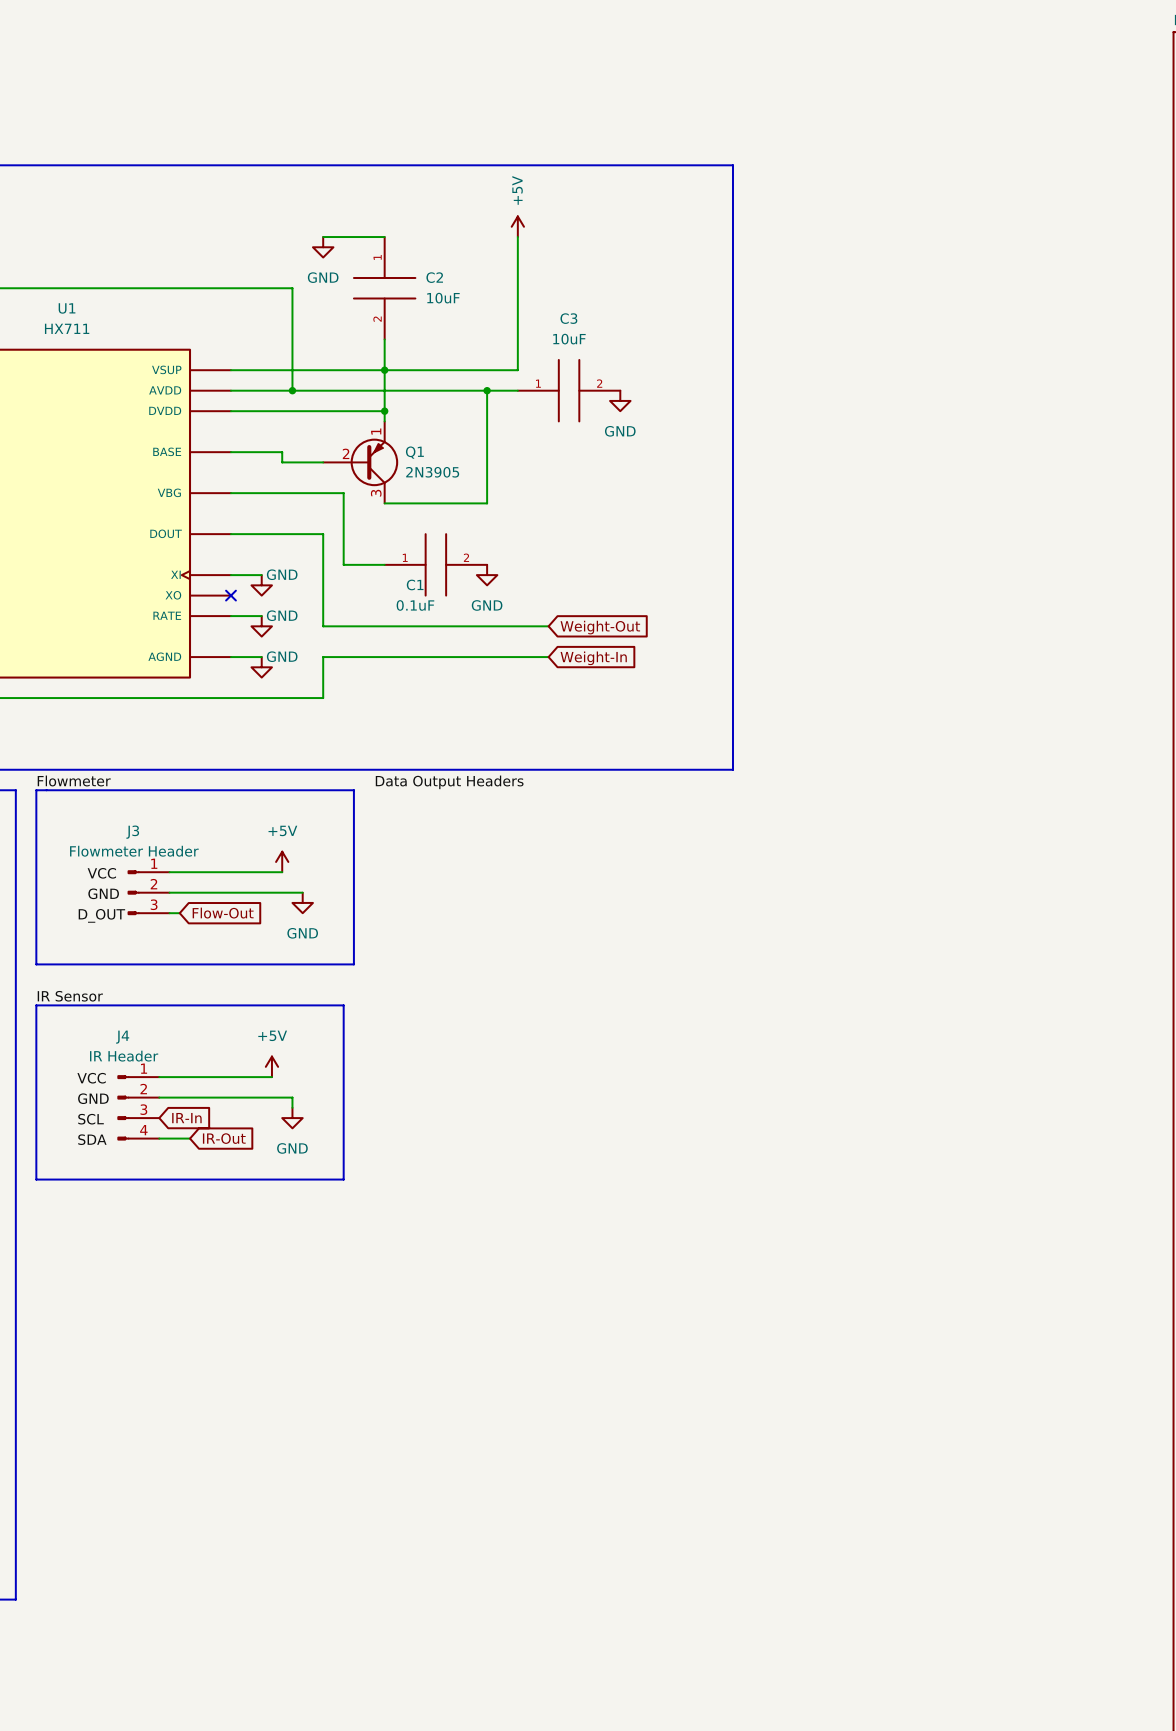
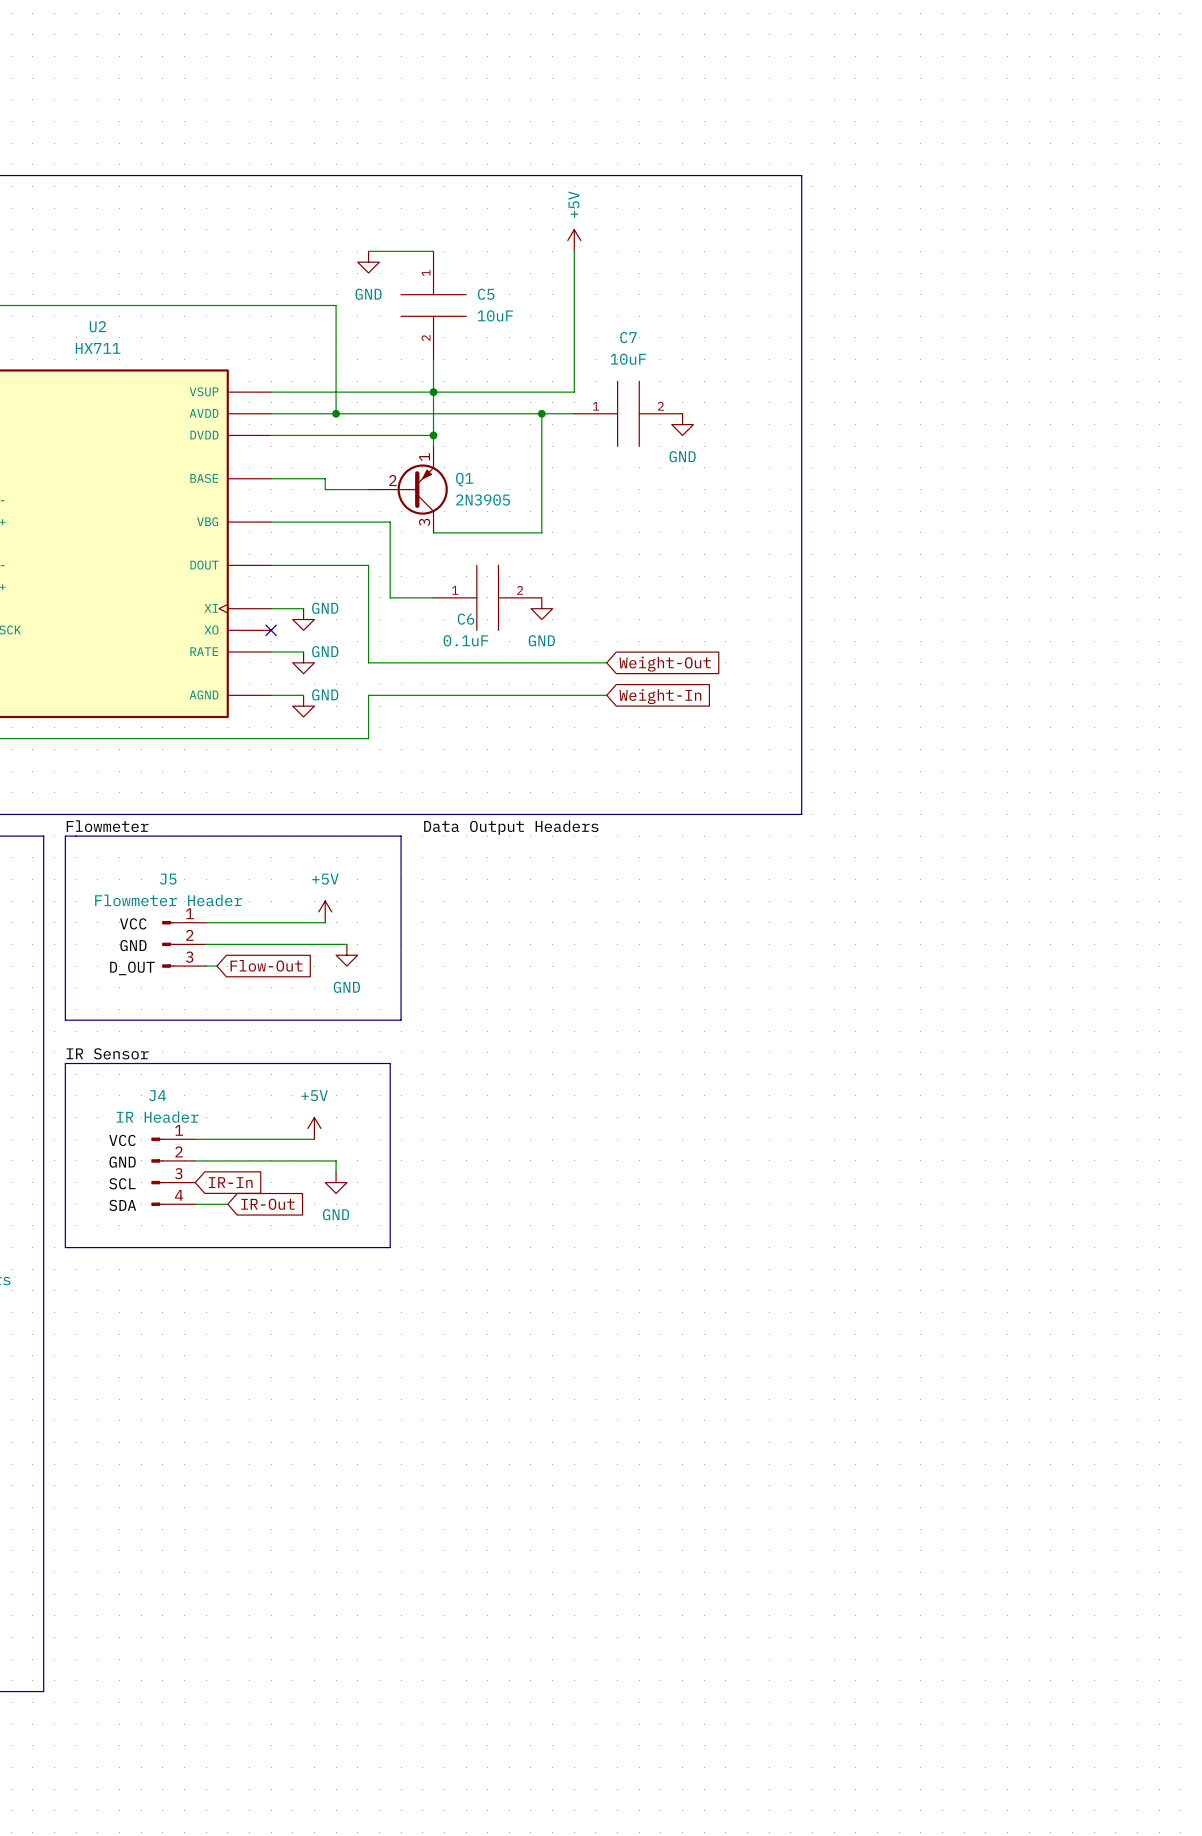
C2 name: C2 (434, 277) -> C5 (486, 294)
U1 name: U1 (67, 308) -> U2 (97, 326)
C3 name: C3 (568, 318) -> C7 (628, 337)
C1 name: C1 (415, 584) -> C6 (466, 619)
J3 name: J3 (132, 832) -> J5 (168, 879)

